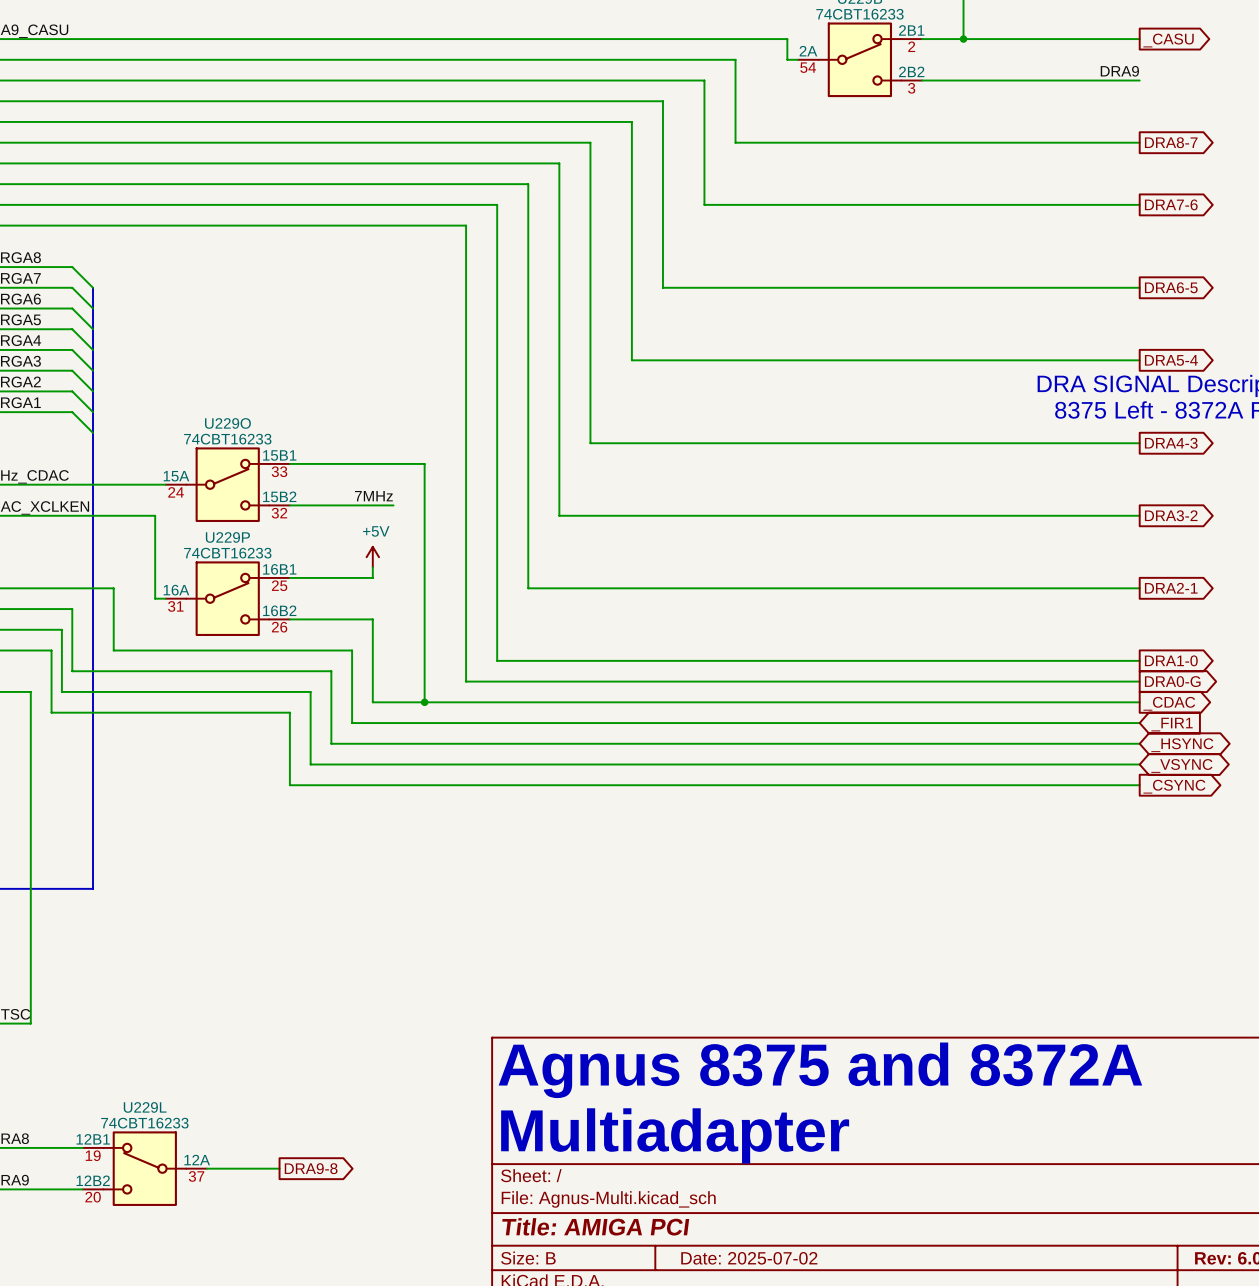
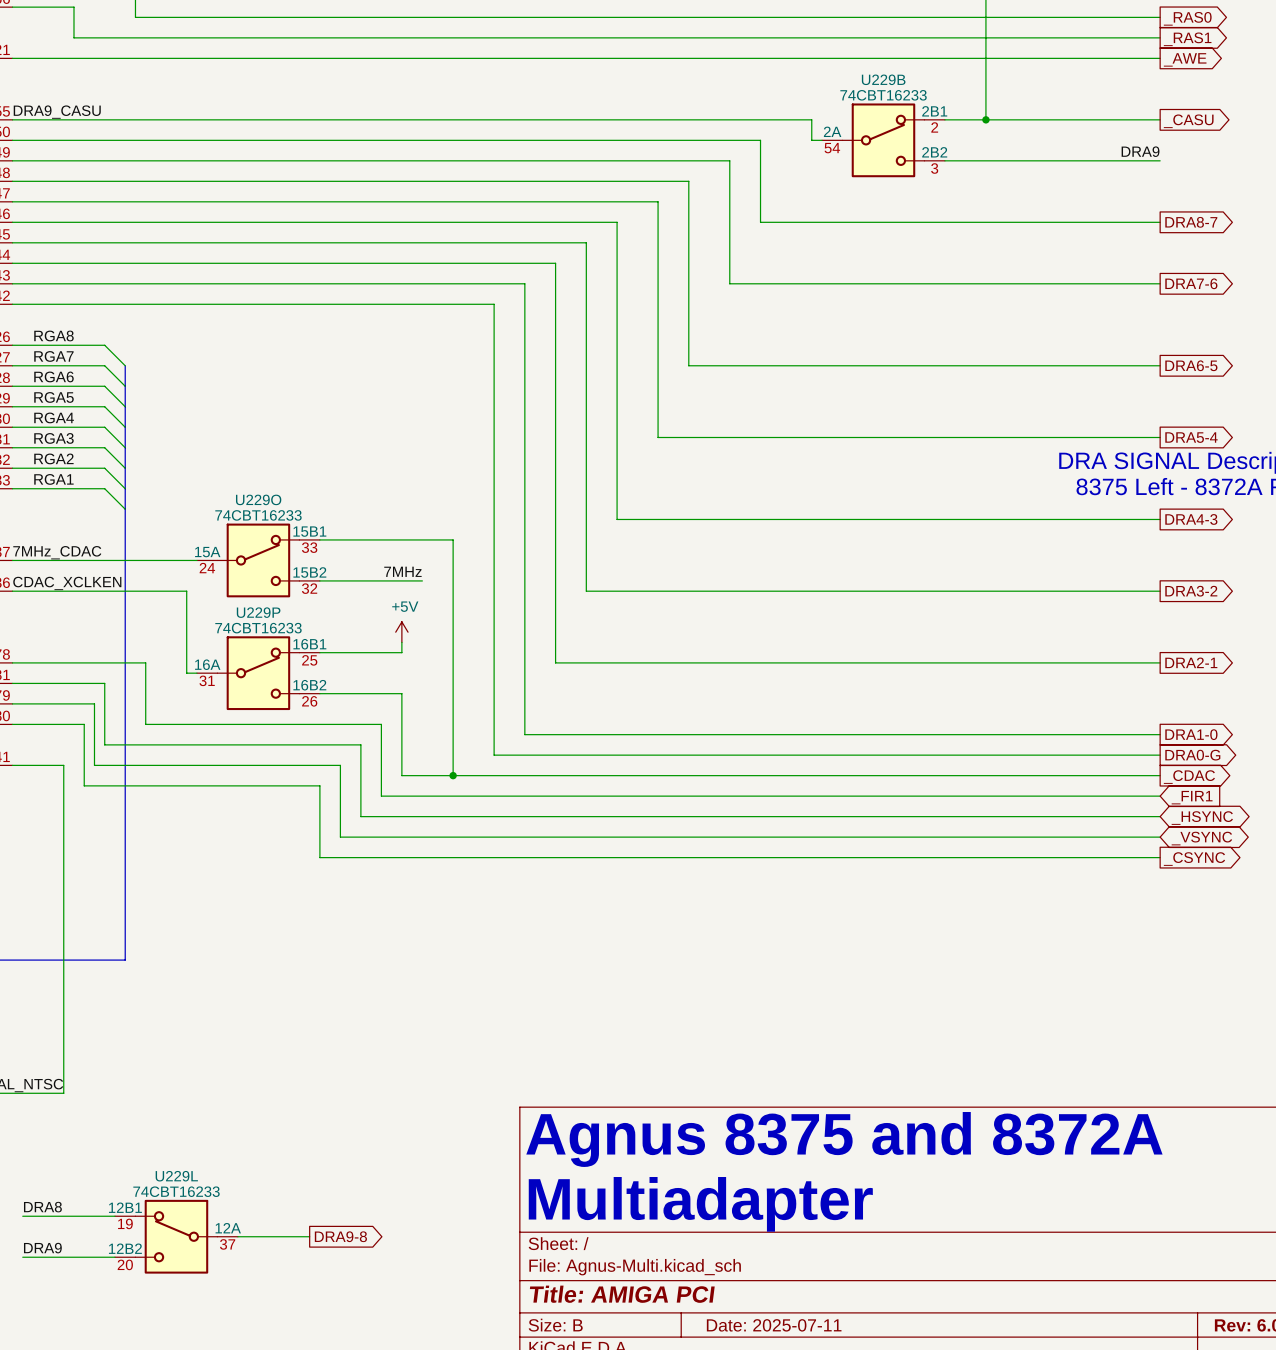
title block: Date: 2025-07-02 (749, 1258) -> Date: 2025-07-11 (774, 1325)

